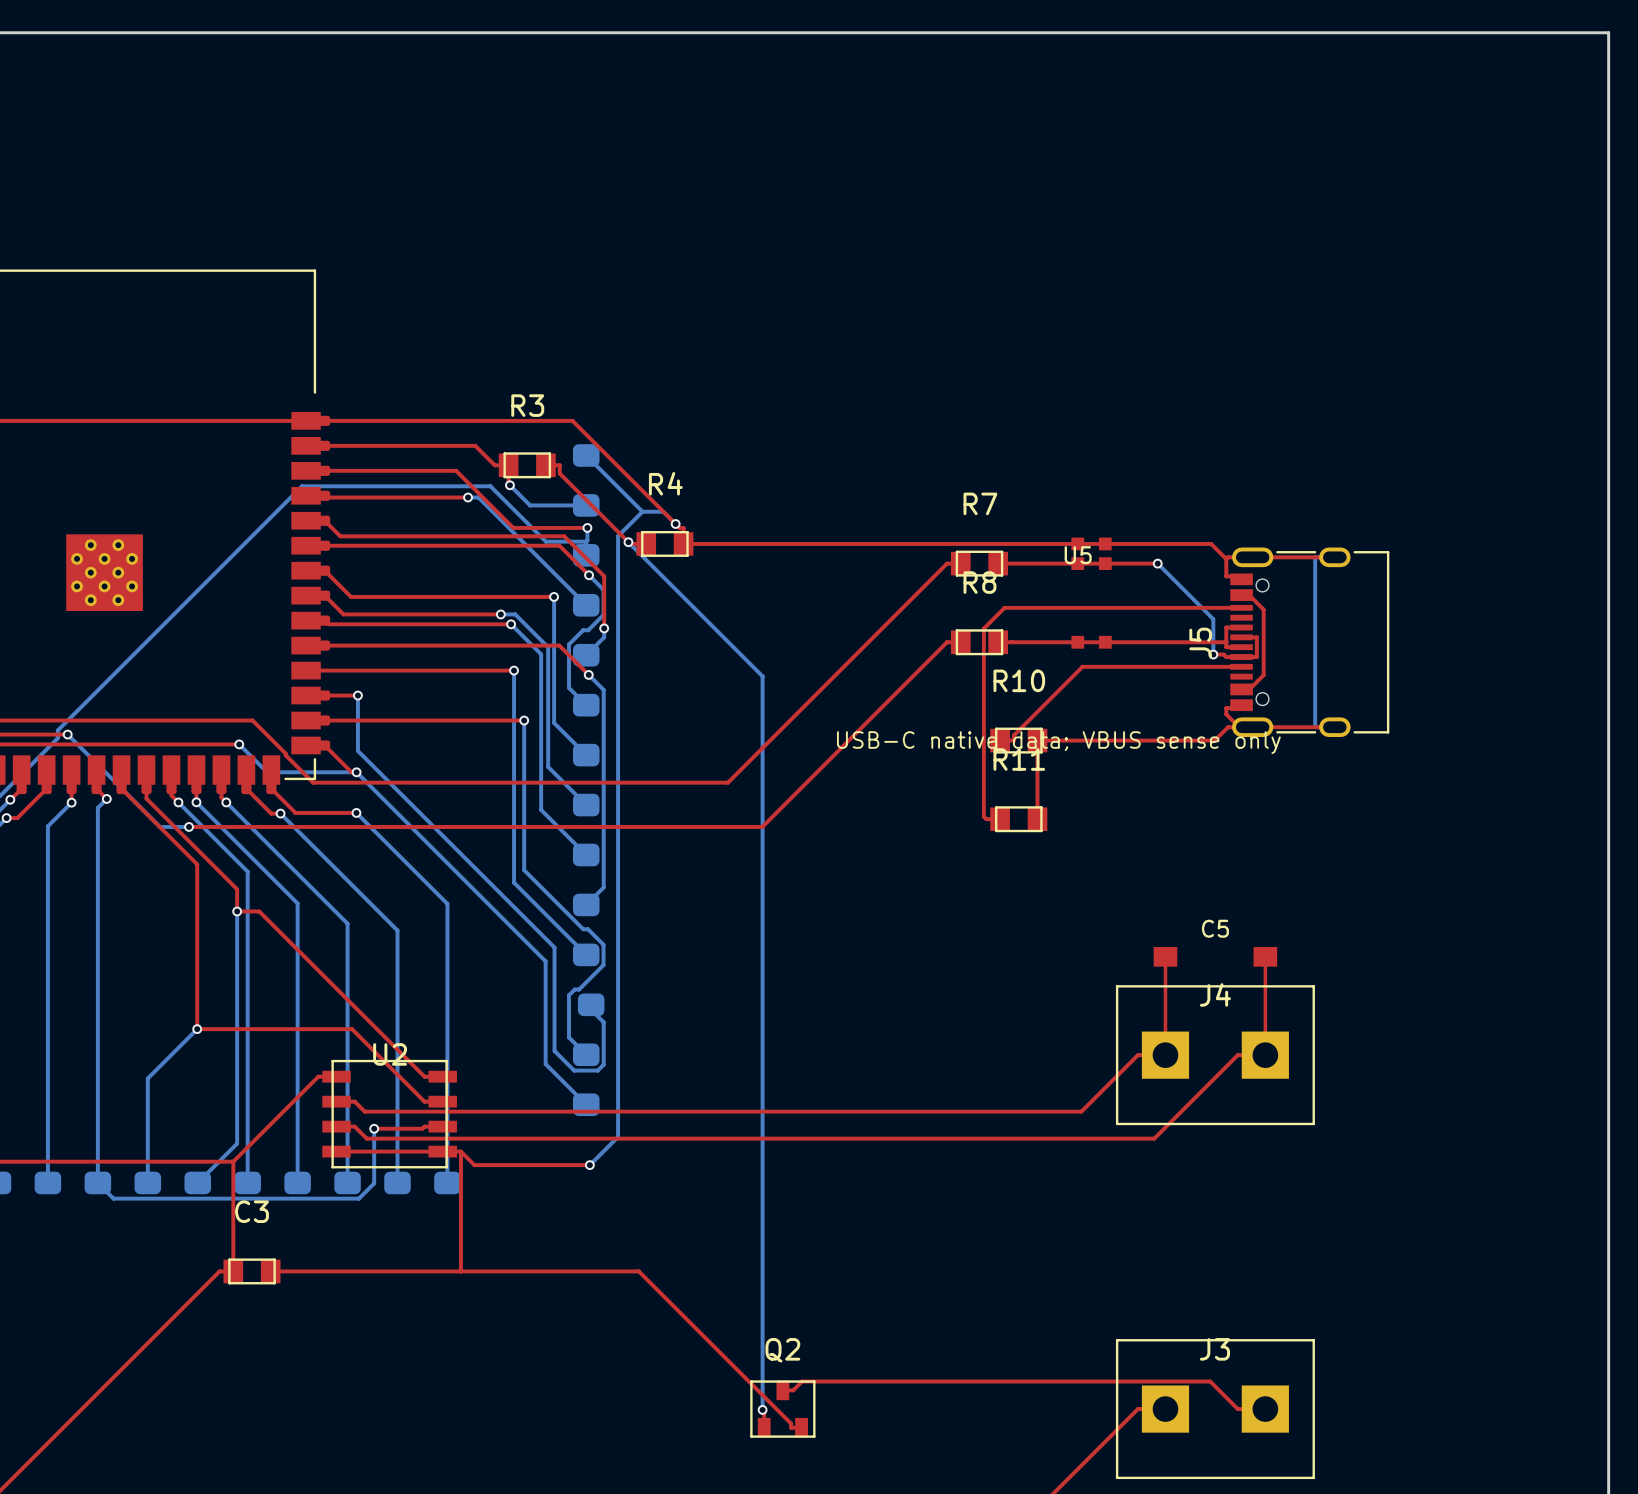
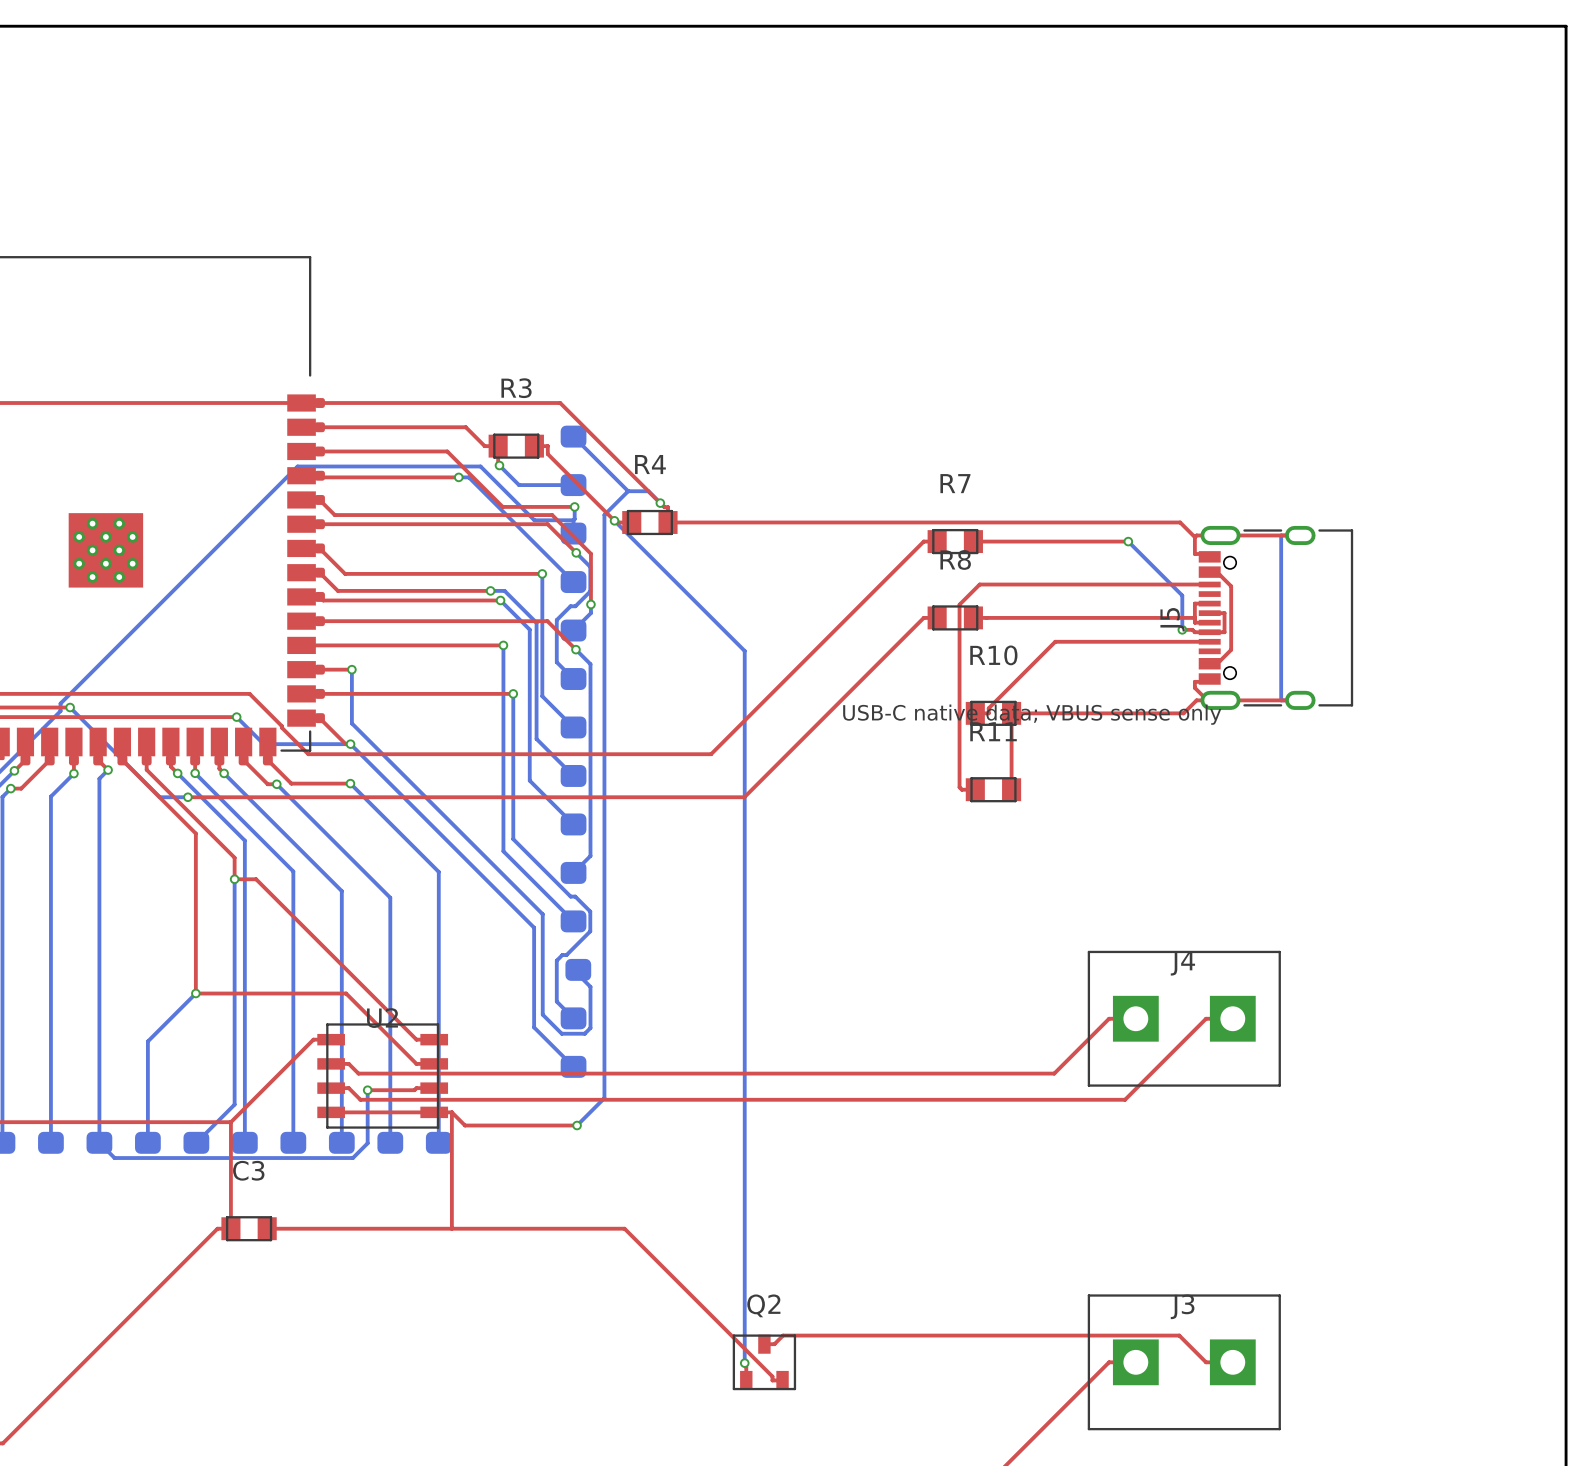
U5: (1091, 593) -> none
top track: (1165, 956) (1165, 1055) -> none
C5: (1215, 956) -> none
top track: (1265, 956) (1265, 1055) -> none

